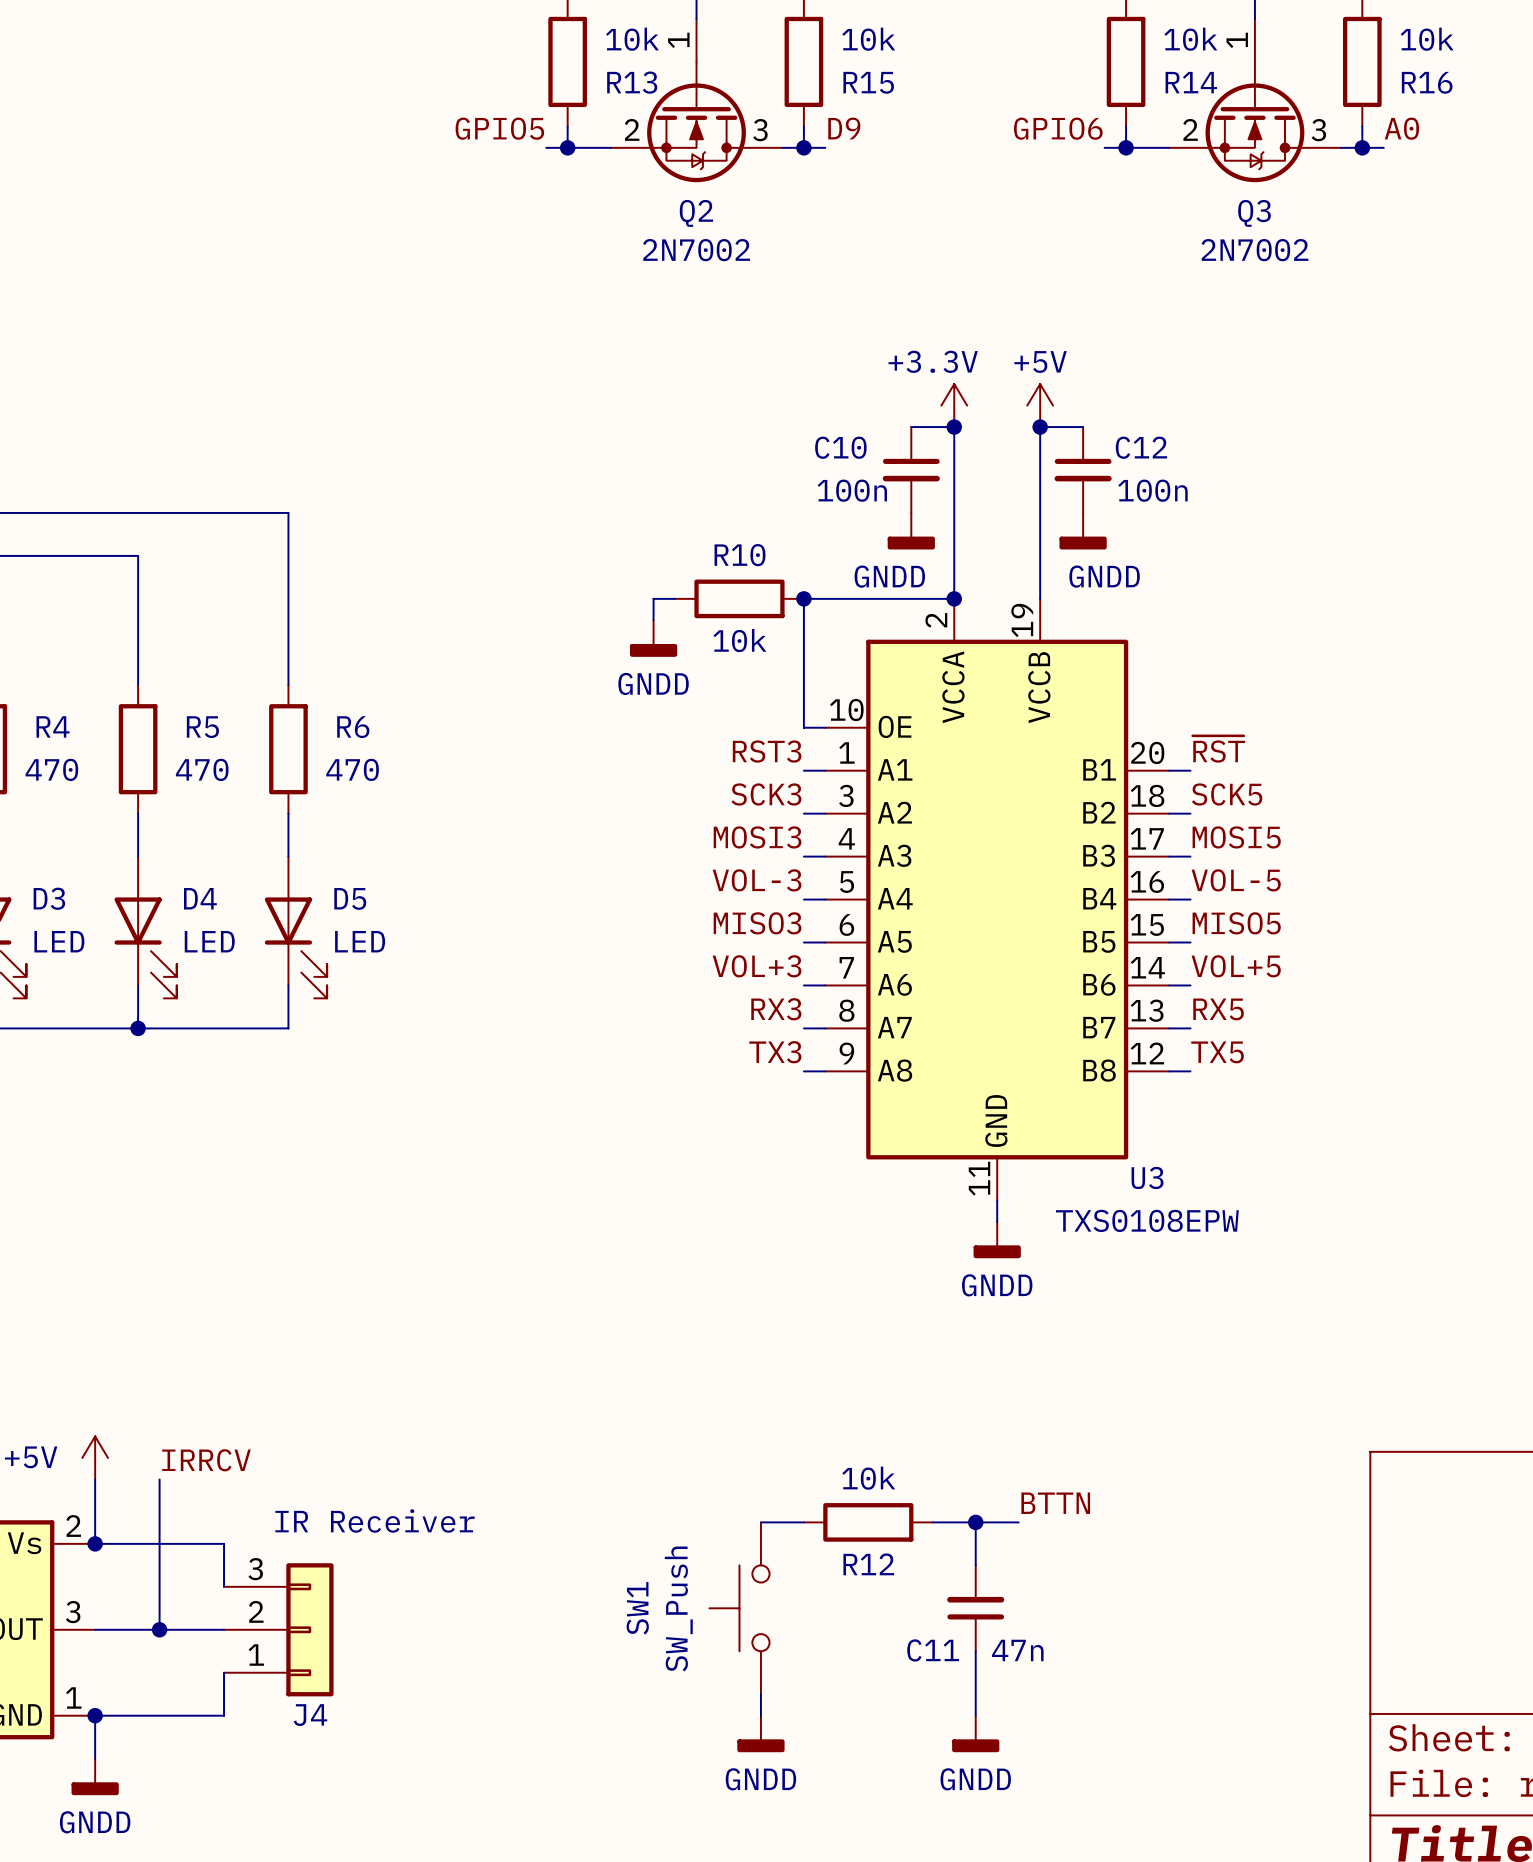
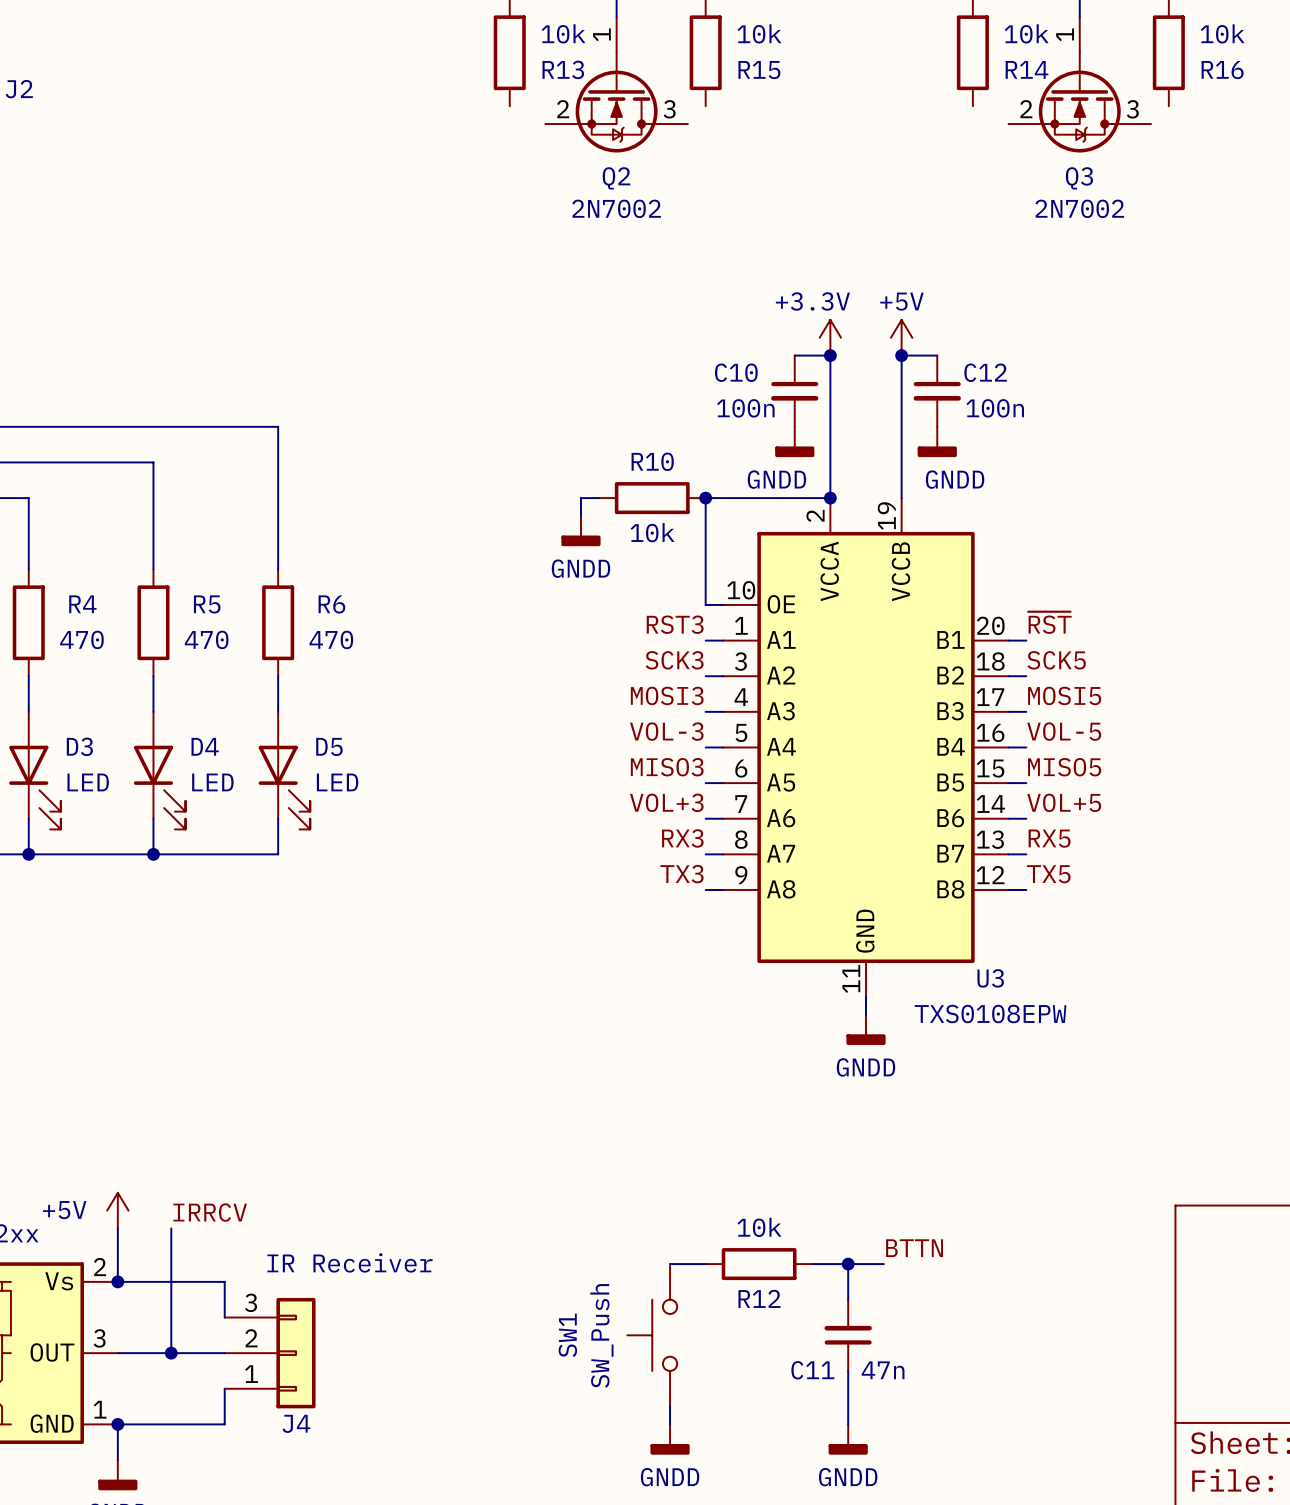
wire: (567, 126) (567, 147) -> none
wire: (803, 126) (803, 147) -> none
wire: (1126, 126) (1126, 147) -> none
wire: (1362, 126) (1362, 147) -> none
label: GPIO5 (499, 128) -> none
label: D9 (844, 128) -> none
label: GPIO6 (1058, 128) -> none
label: A0 (1401, 128) -> none
wire: (546, 147) (610, 147) -> none
junction: (567, 147) -> none
wire: (782, 147) (825, 147) -> none
junction: (803, 147) -> none
wire: (1104, 147) (1169, 147) -> none
junction: (1126, 147) -> none
wire: (1340, 147) (1383, 147) -> none
junction: (1362, 147) -> none

